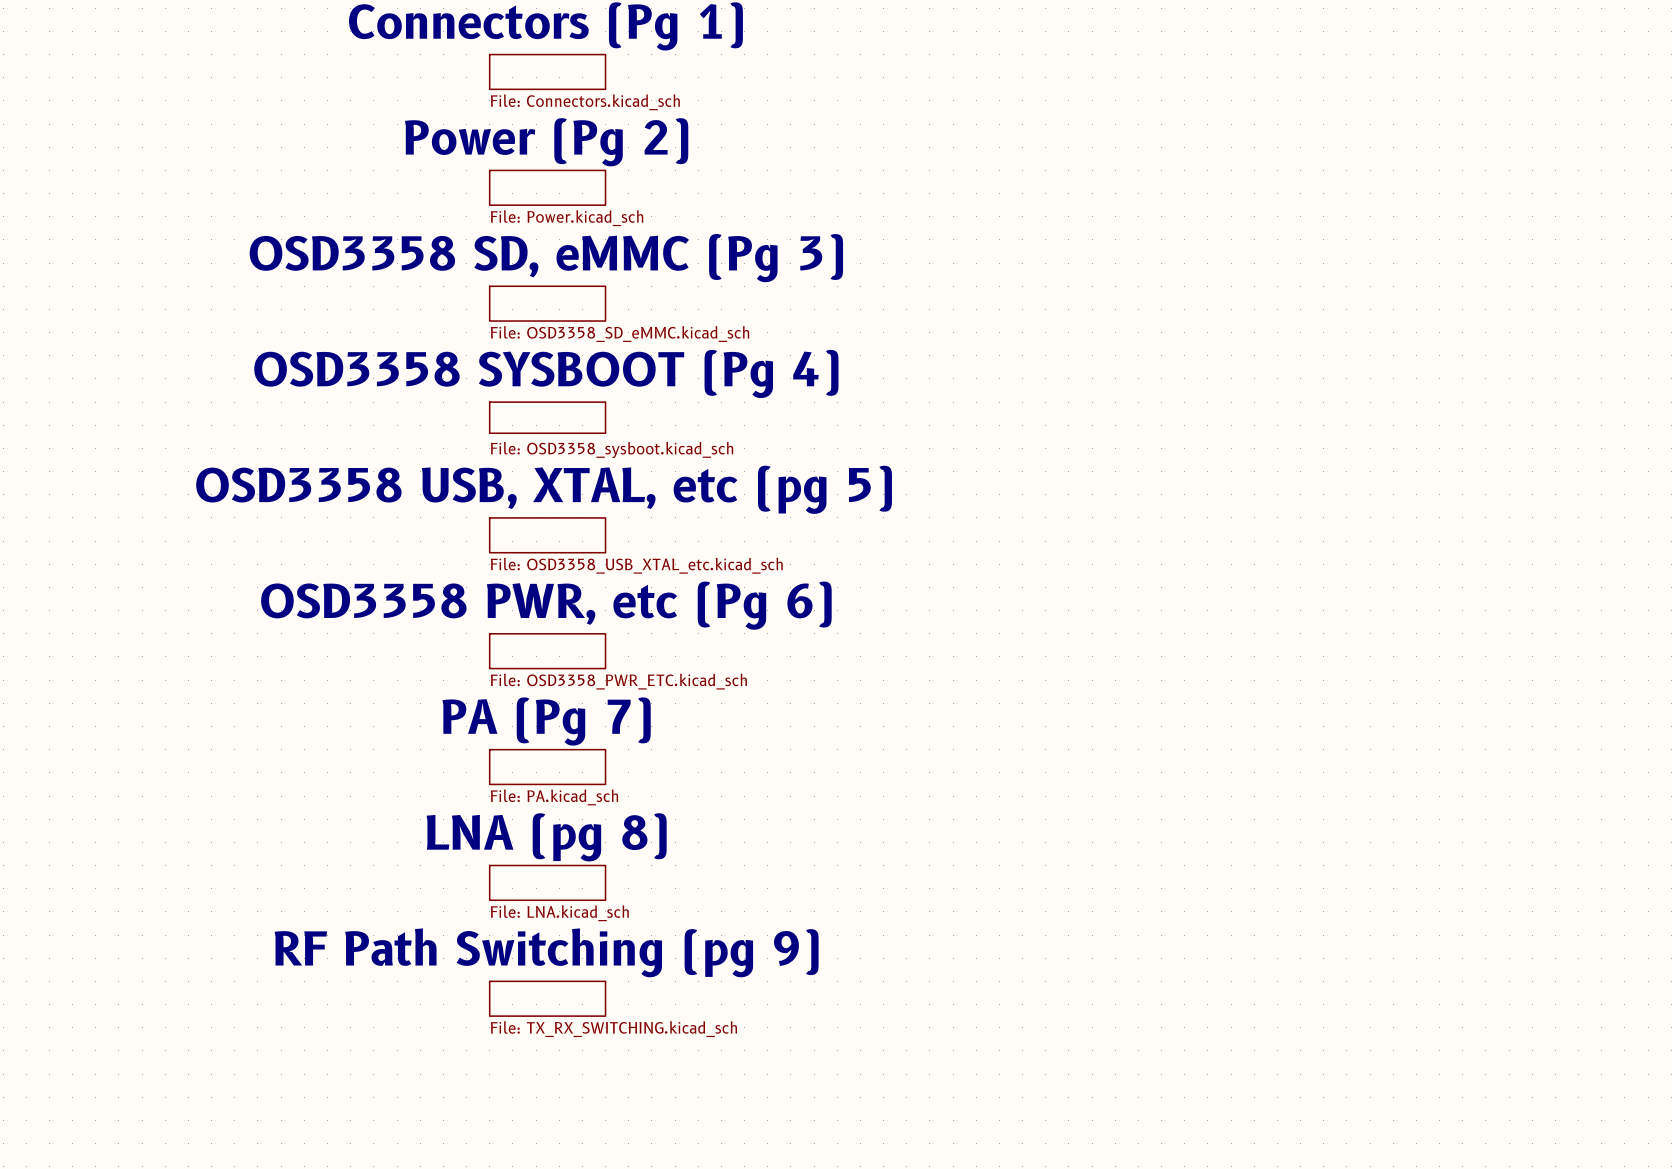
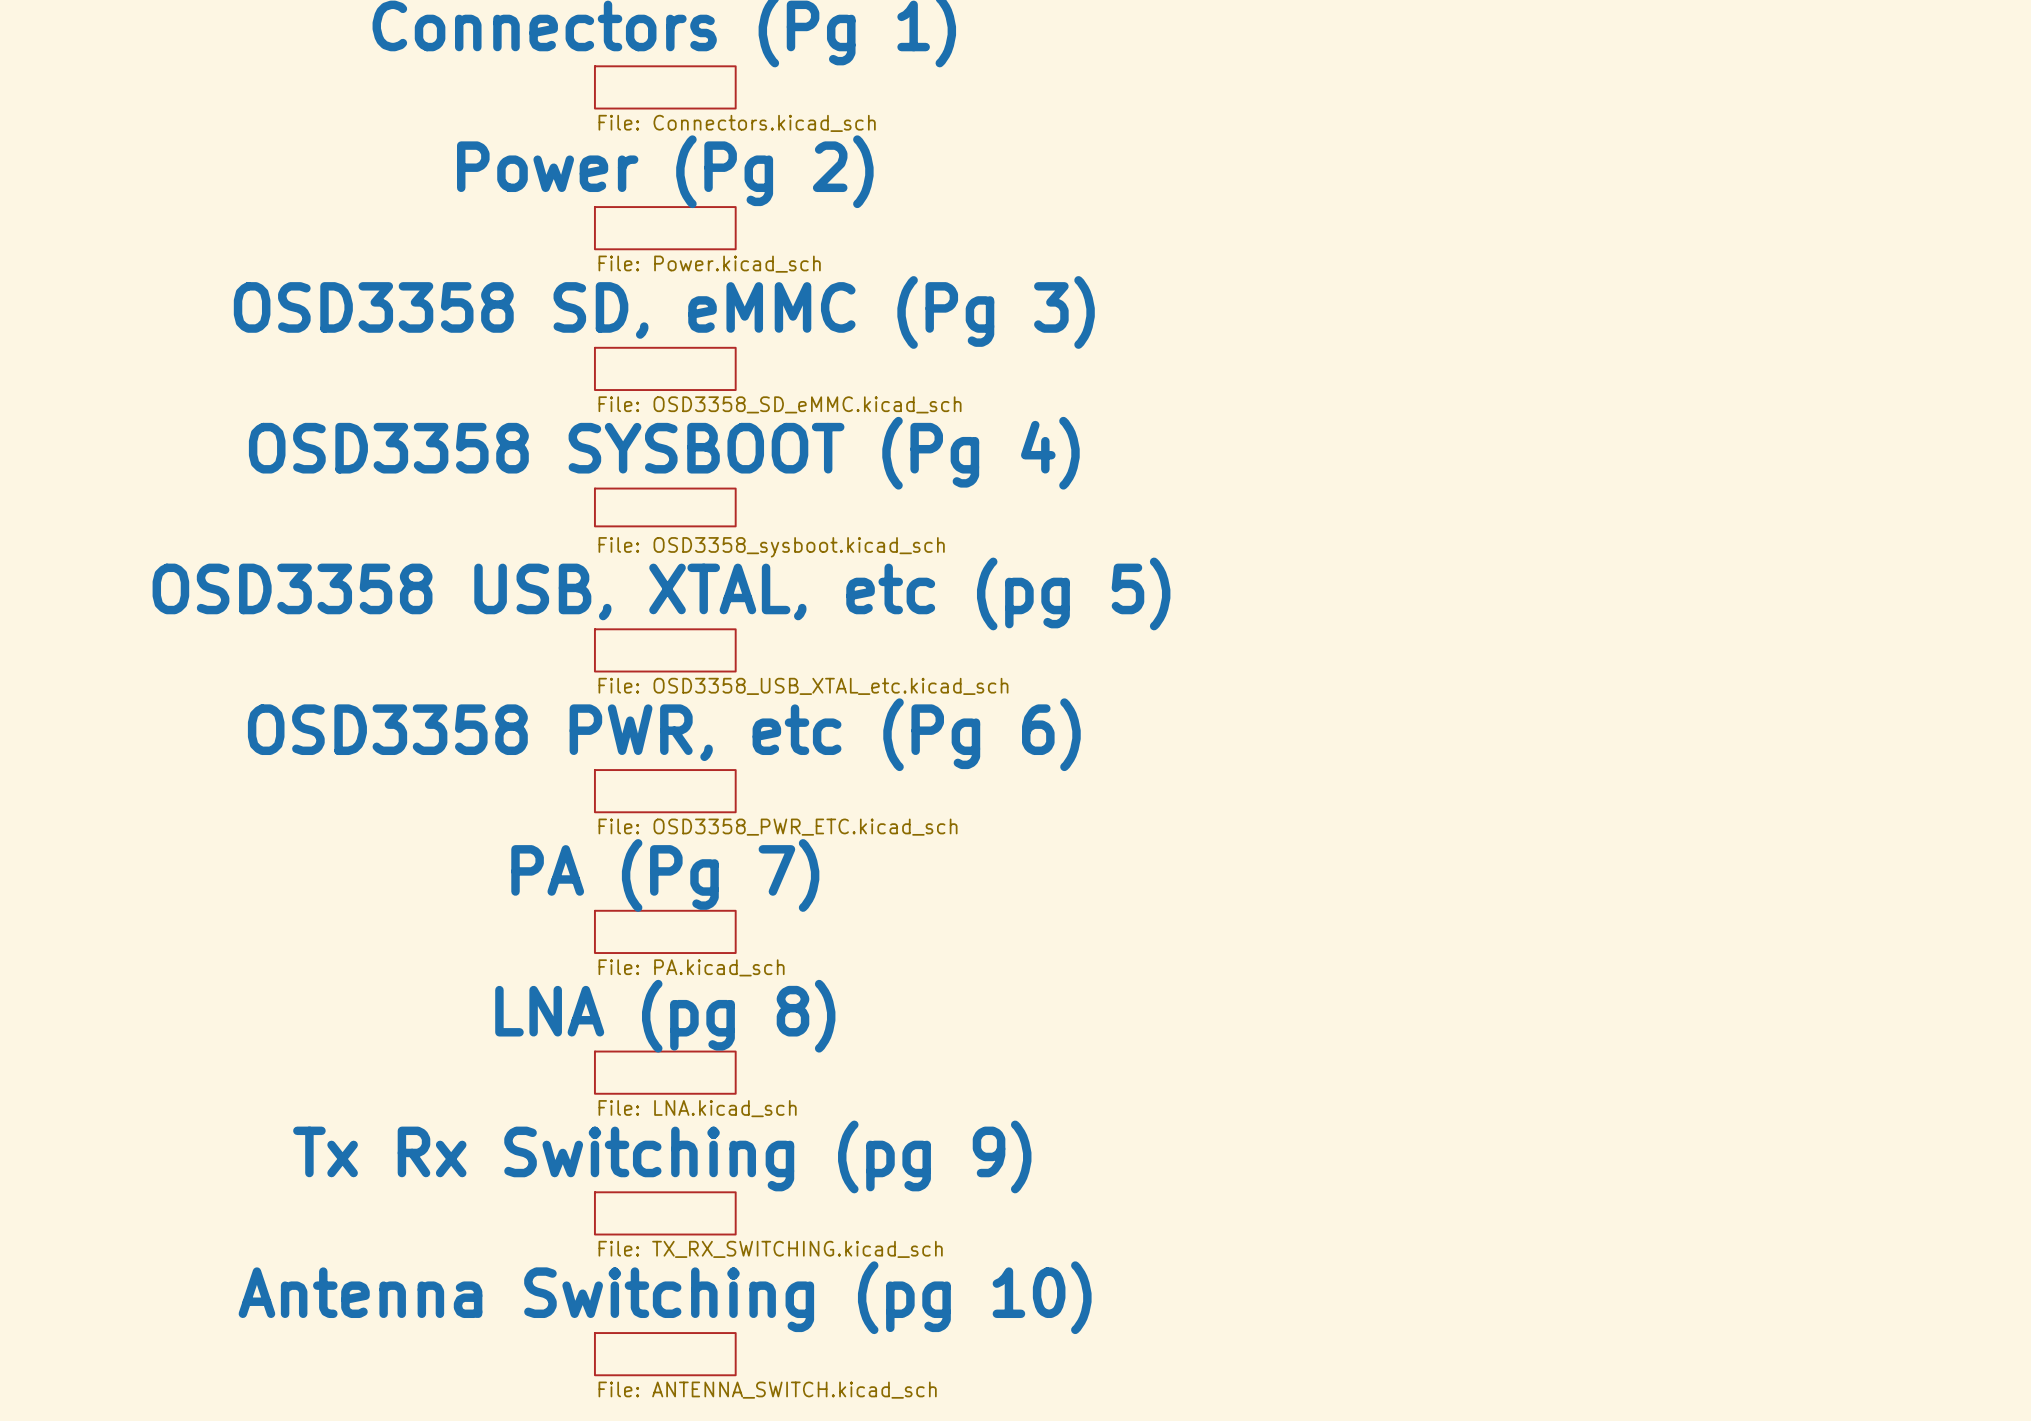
sheet RF Path Switching (pg 9) name: RF Path Switching (pg 9) (546, 952) -> Tx Rx Switching (pg 9) (662, 1156)
sheet Antenna Switching (pg 10): none -> File: ANTENNA_SWITCH.kicad_sch (665, 1354)

